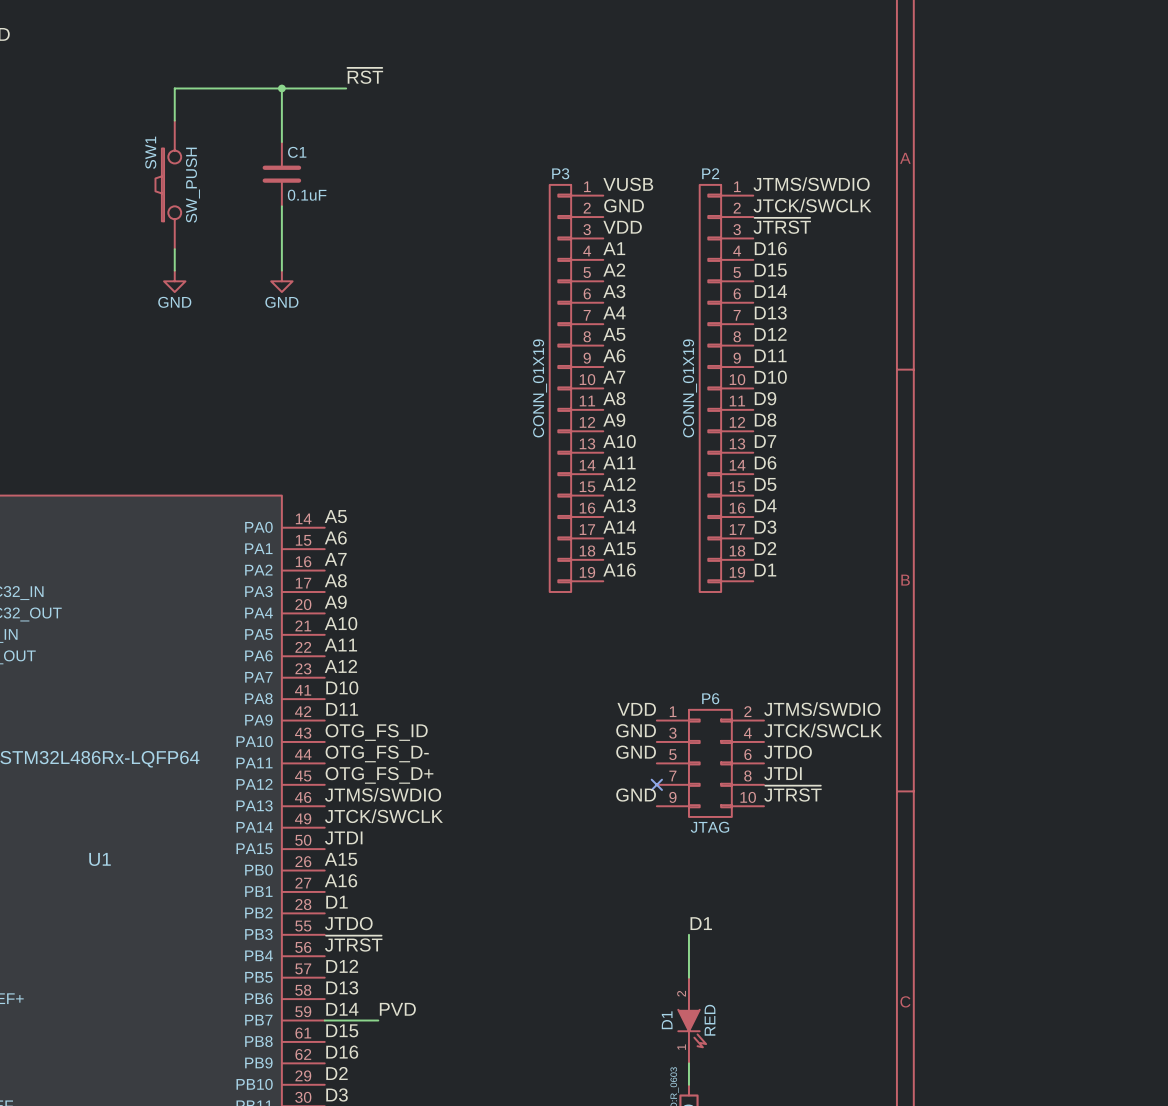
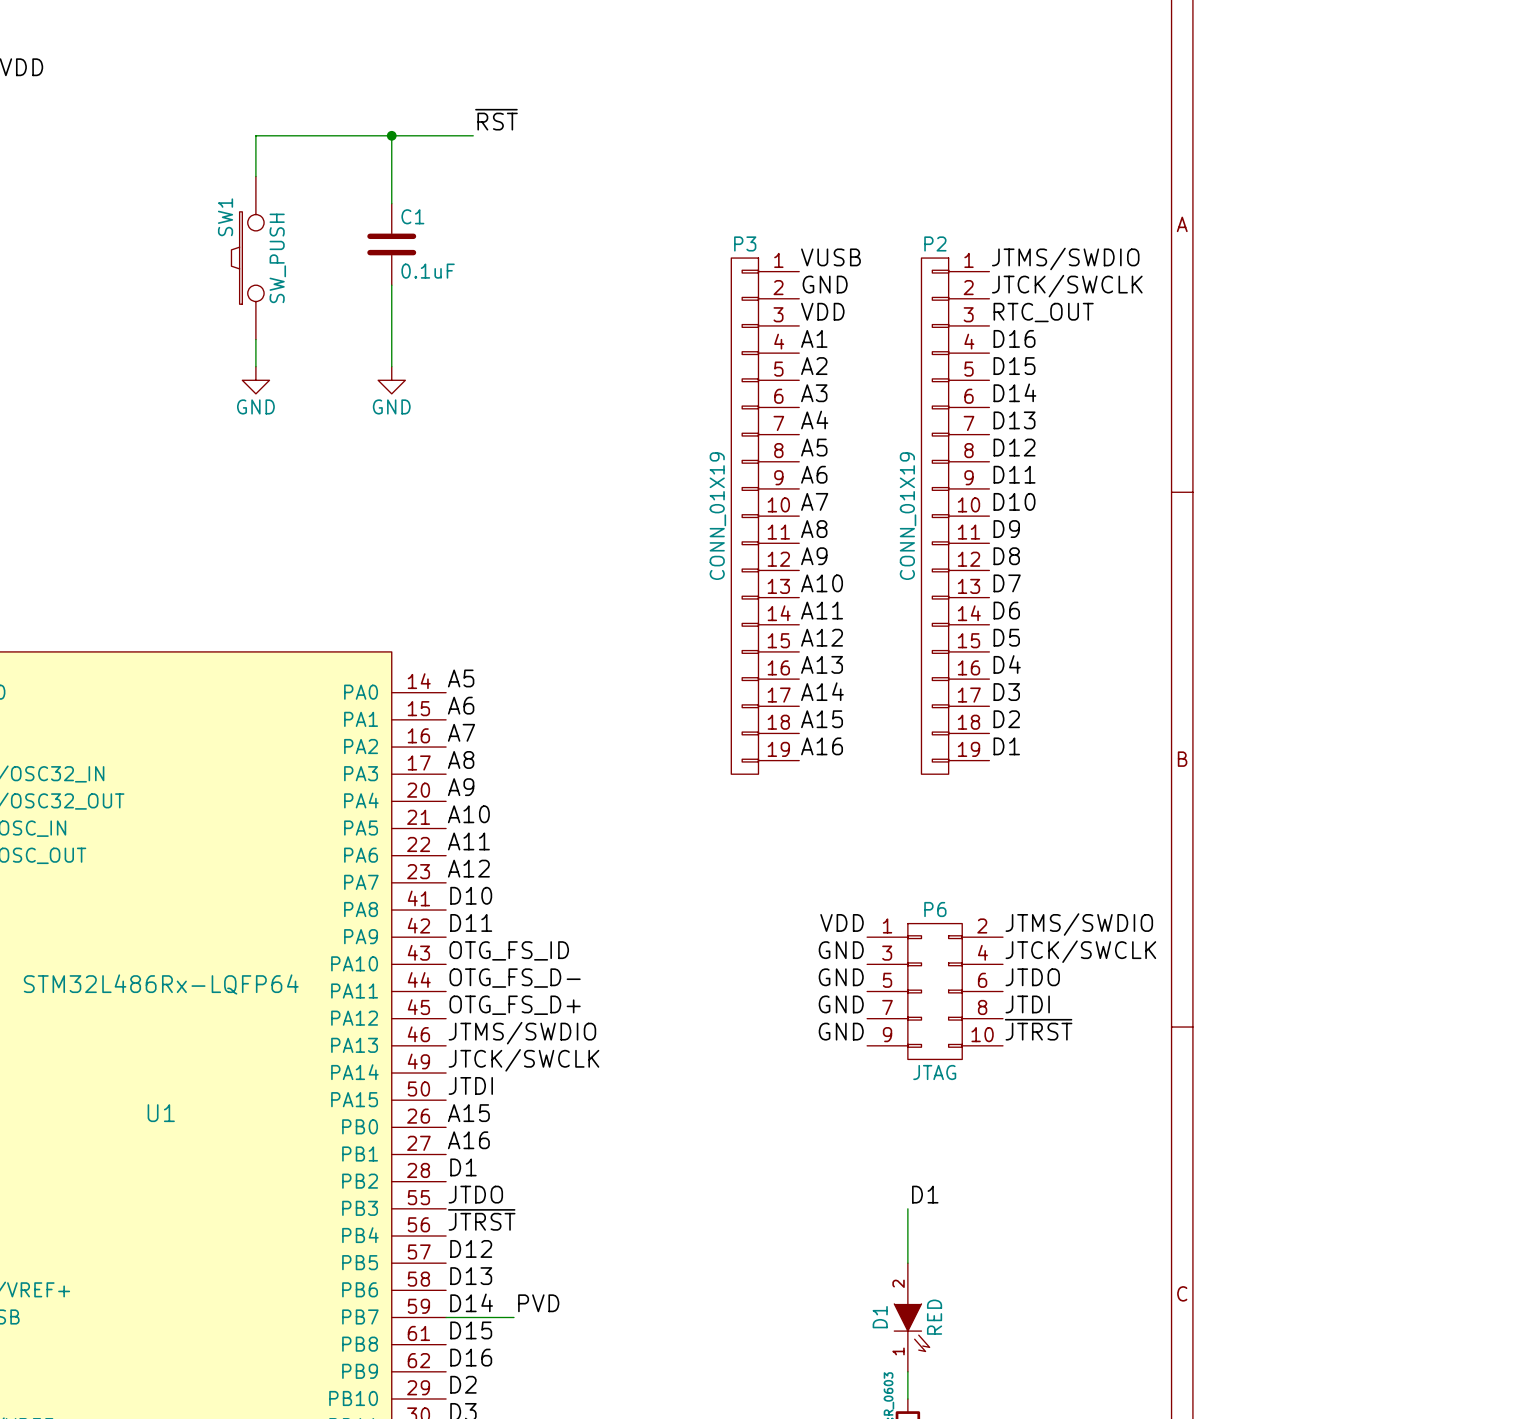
label: ~{JTRST} (782, 225) -> RTC_OUT (1043, 312)
label: none -> GND (841, 1004)
no-connect mark: (656, 784) -> none

